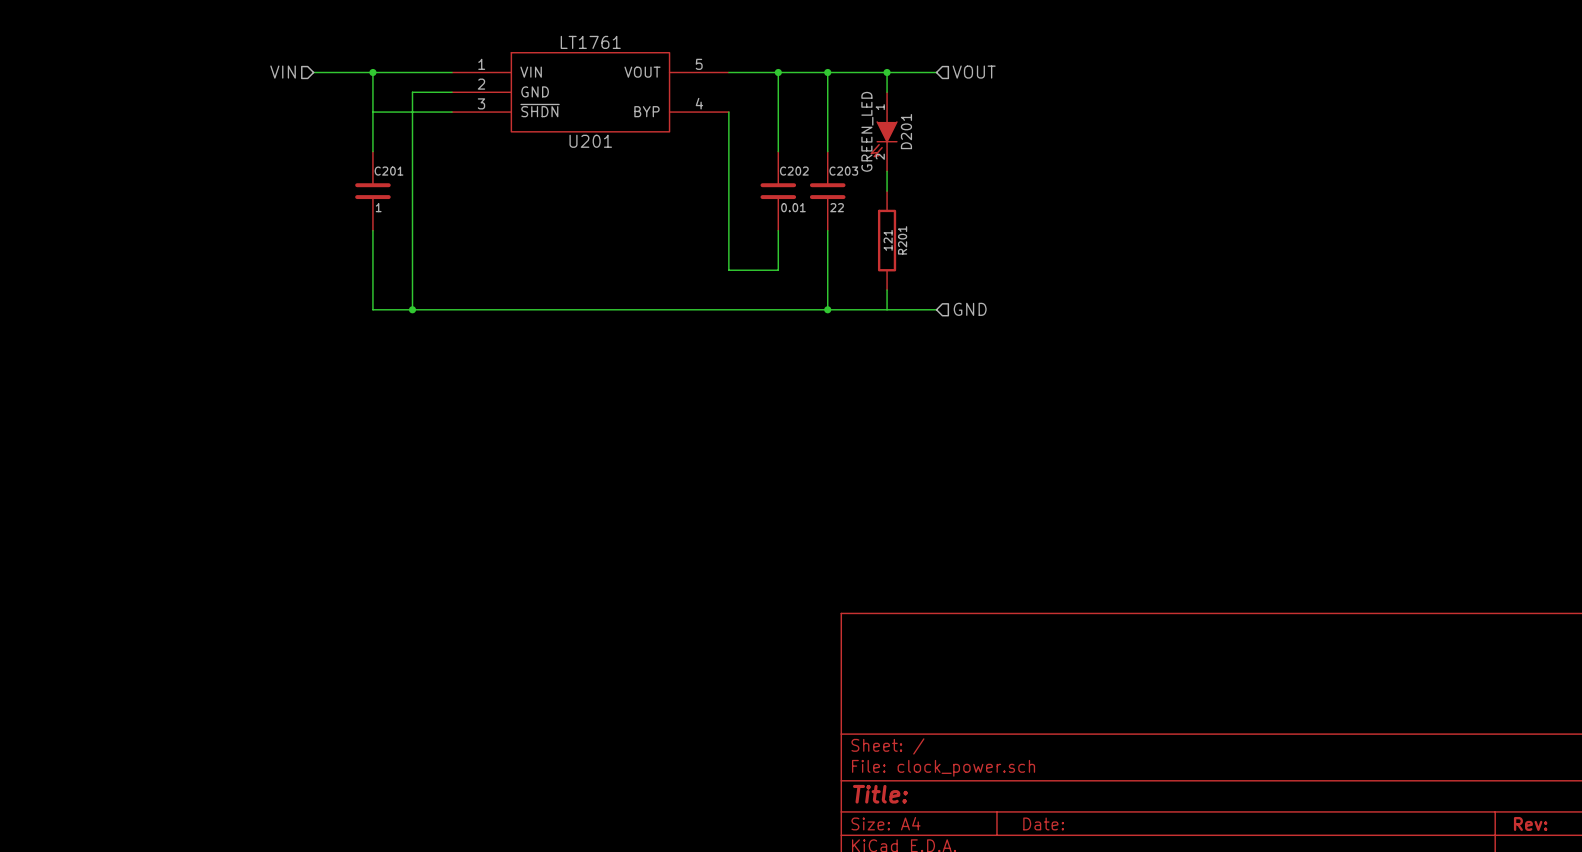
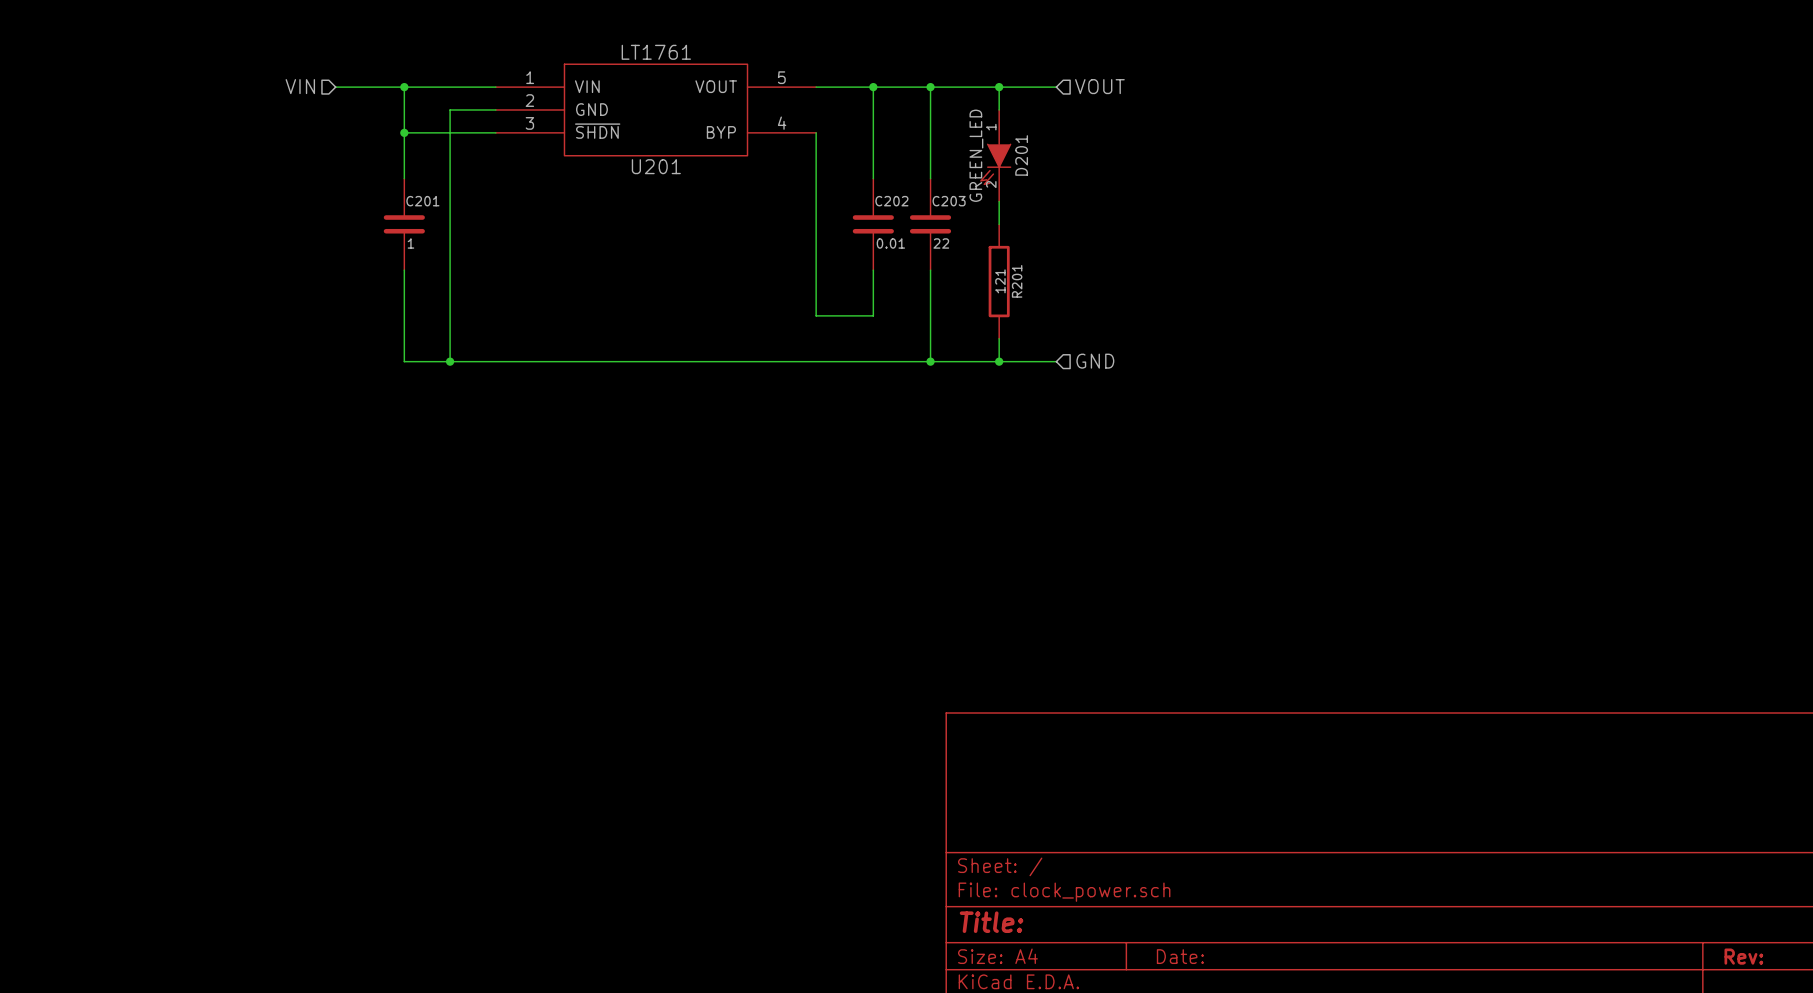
junction: none -> (404, 132)
junction: none -> (999, 361)

